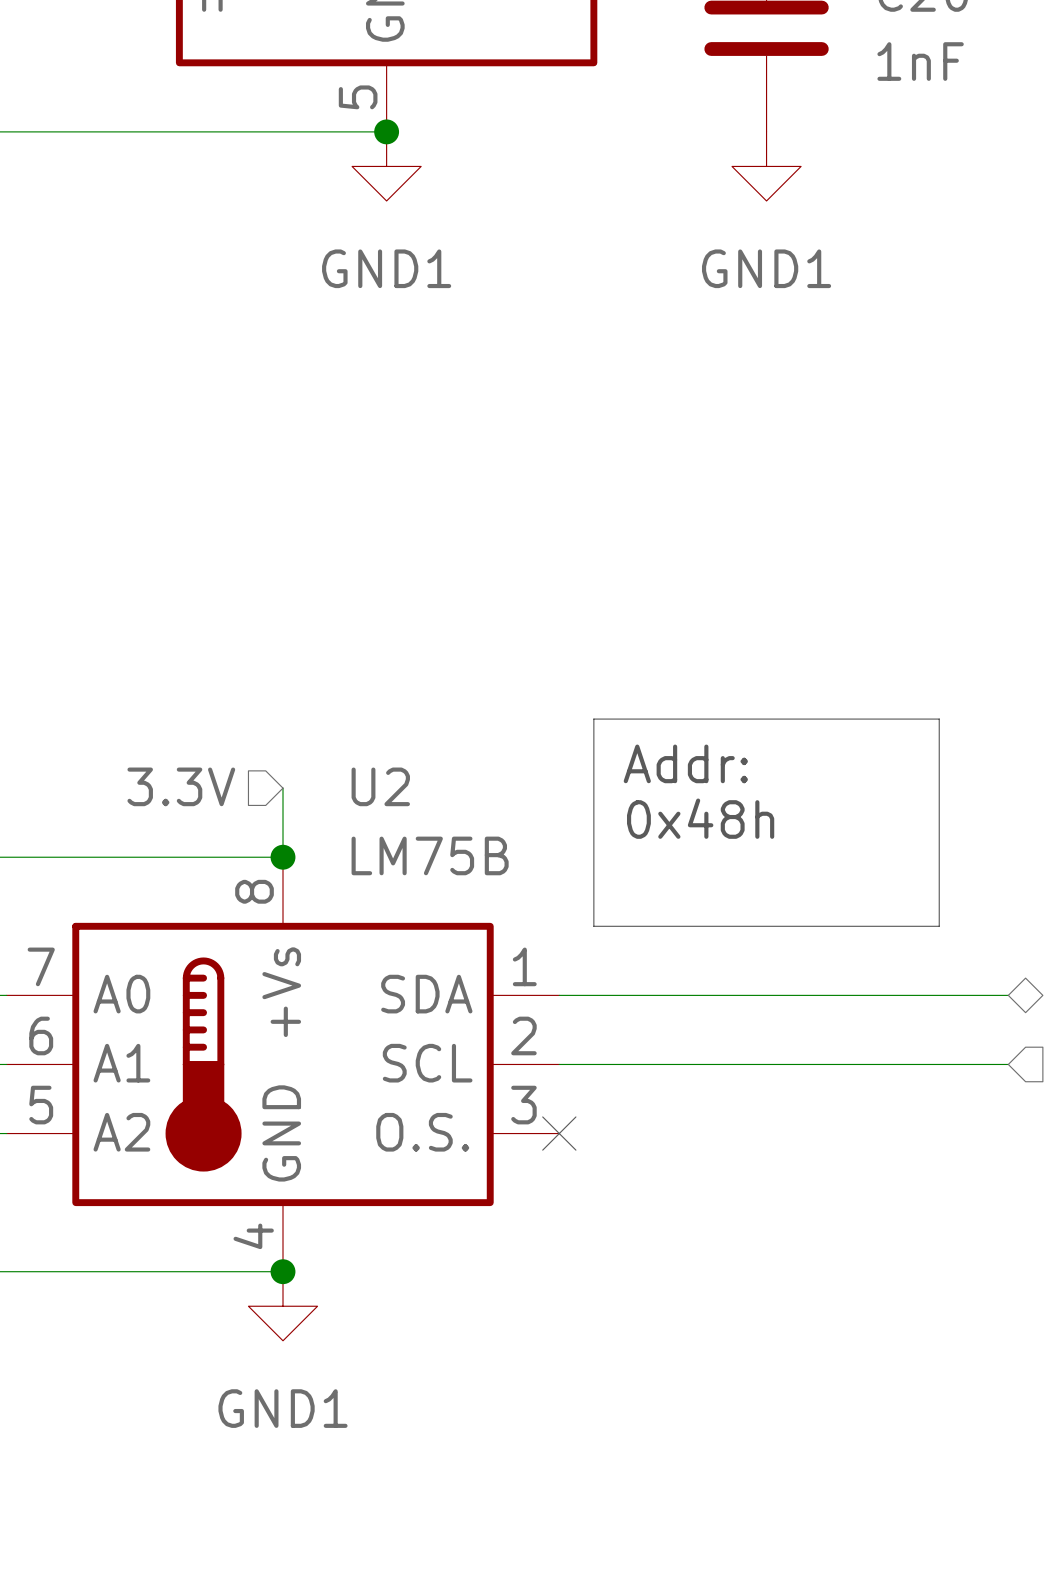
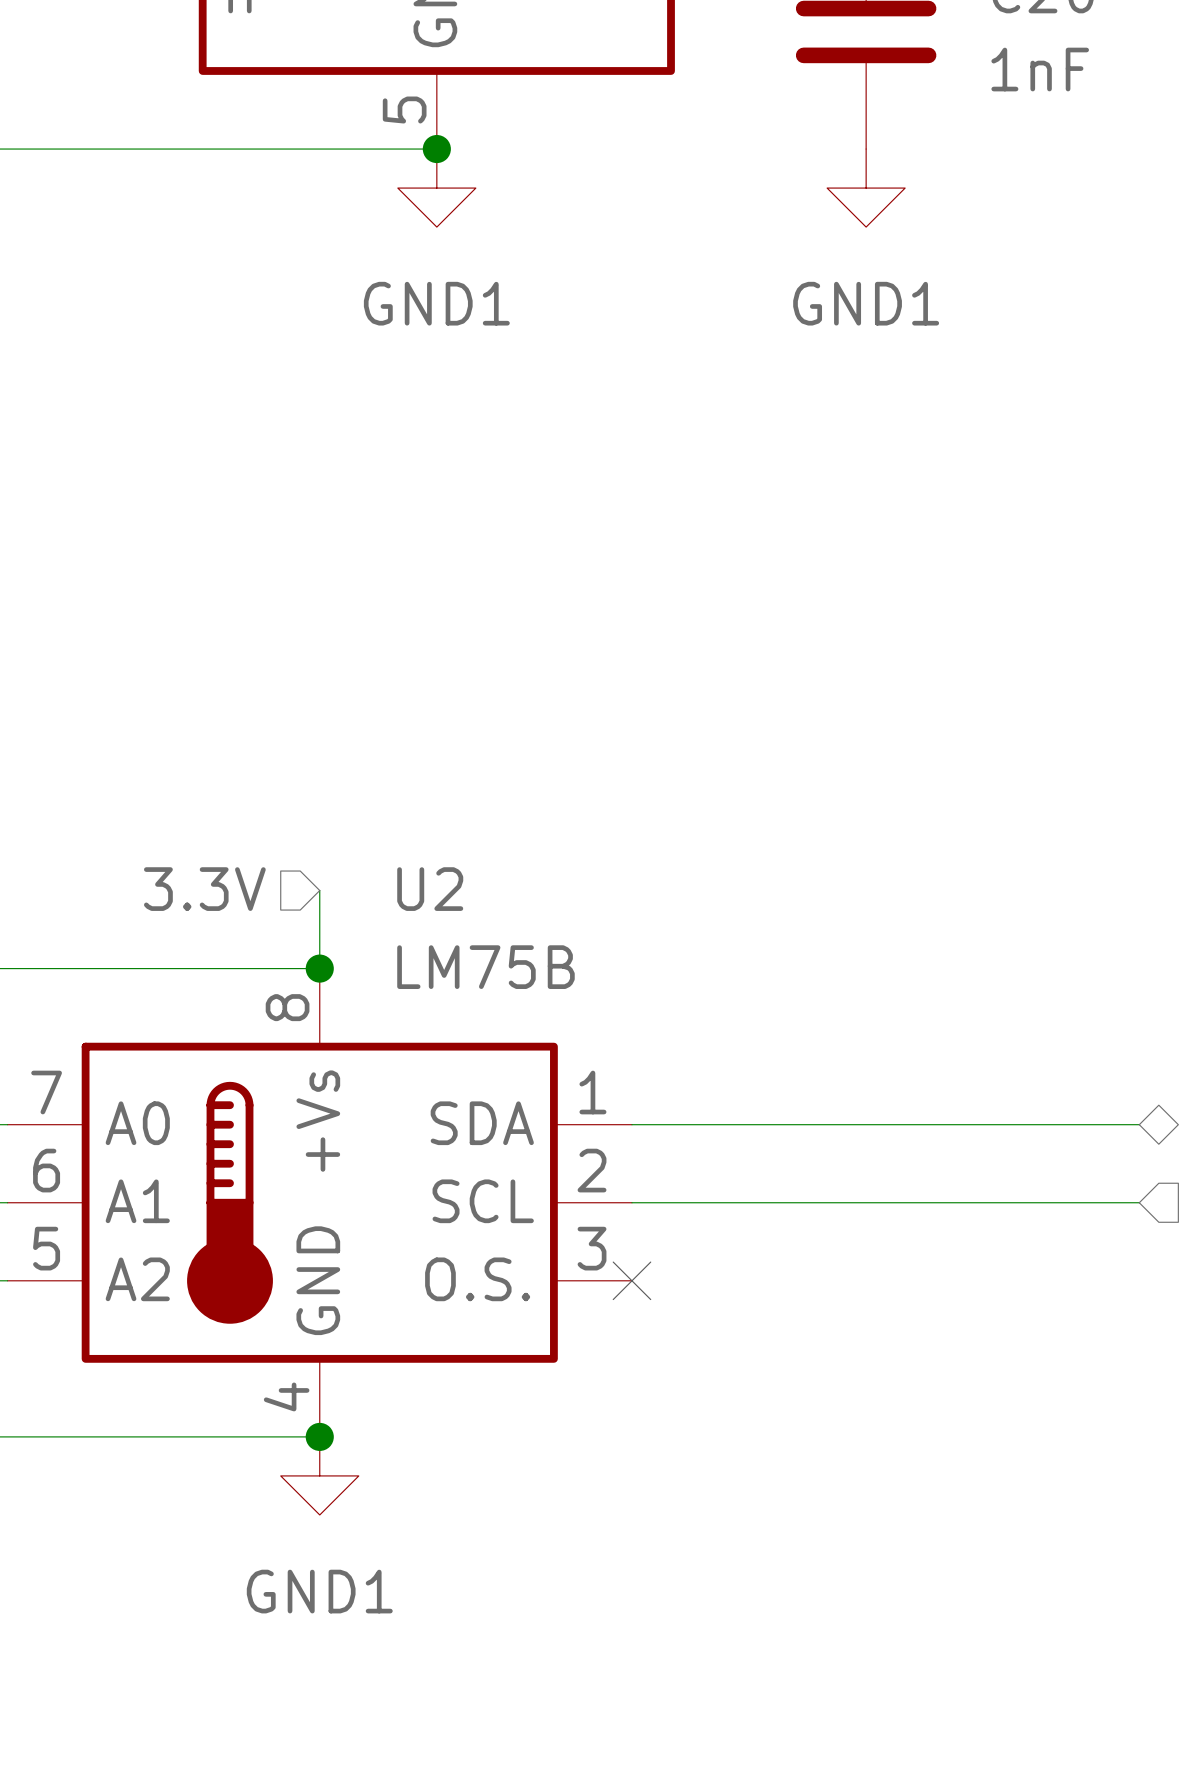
line: (593, 719) (939, 719) (939, 926) (593, 926) (593, 719) -> none
text: Addr: (685, 763) -> none
text: 0x48h (700, 818) -> none

